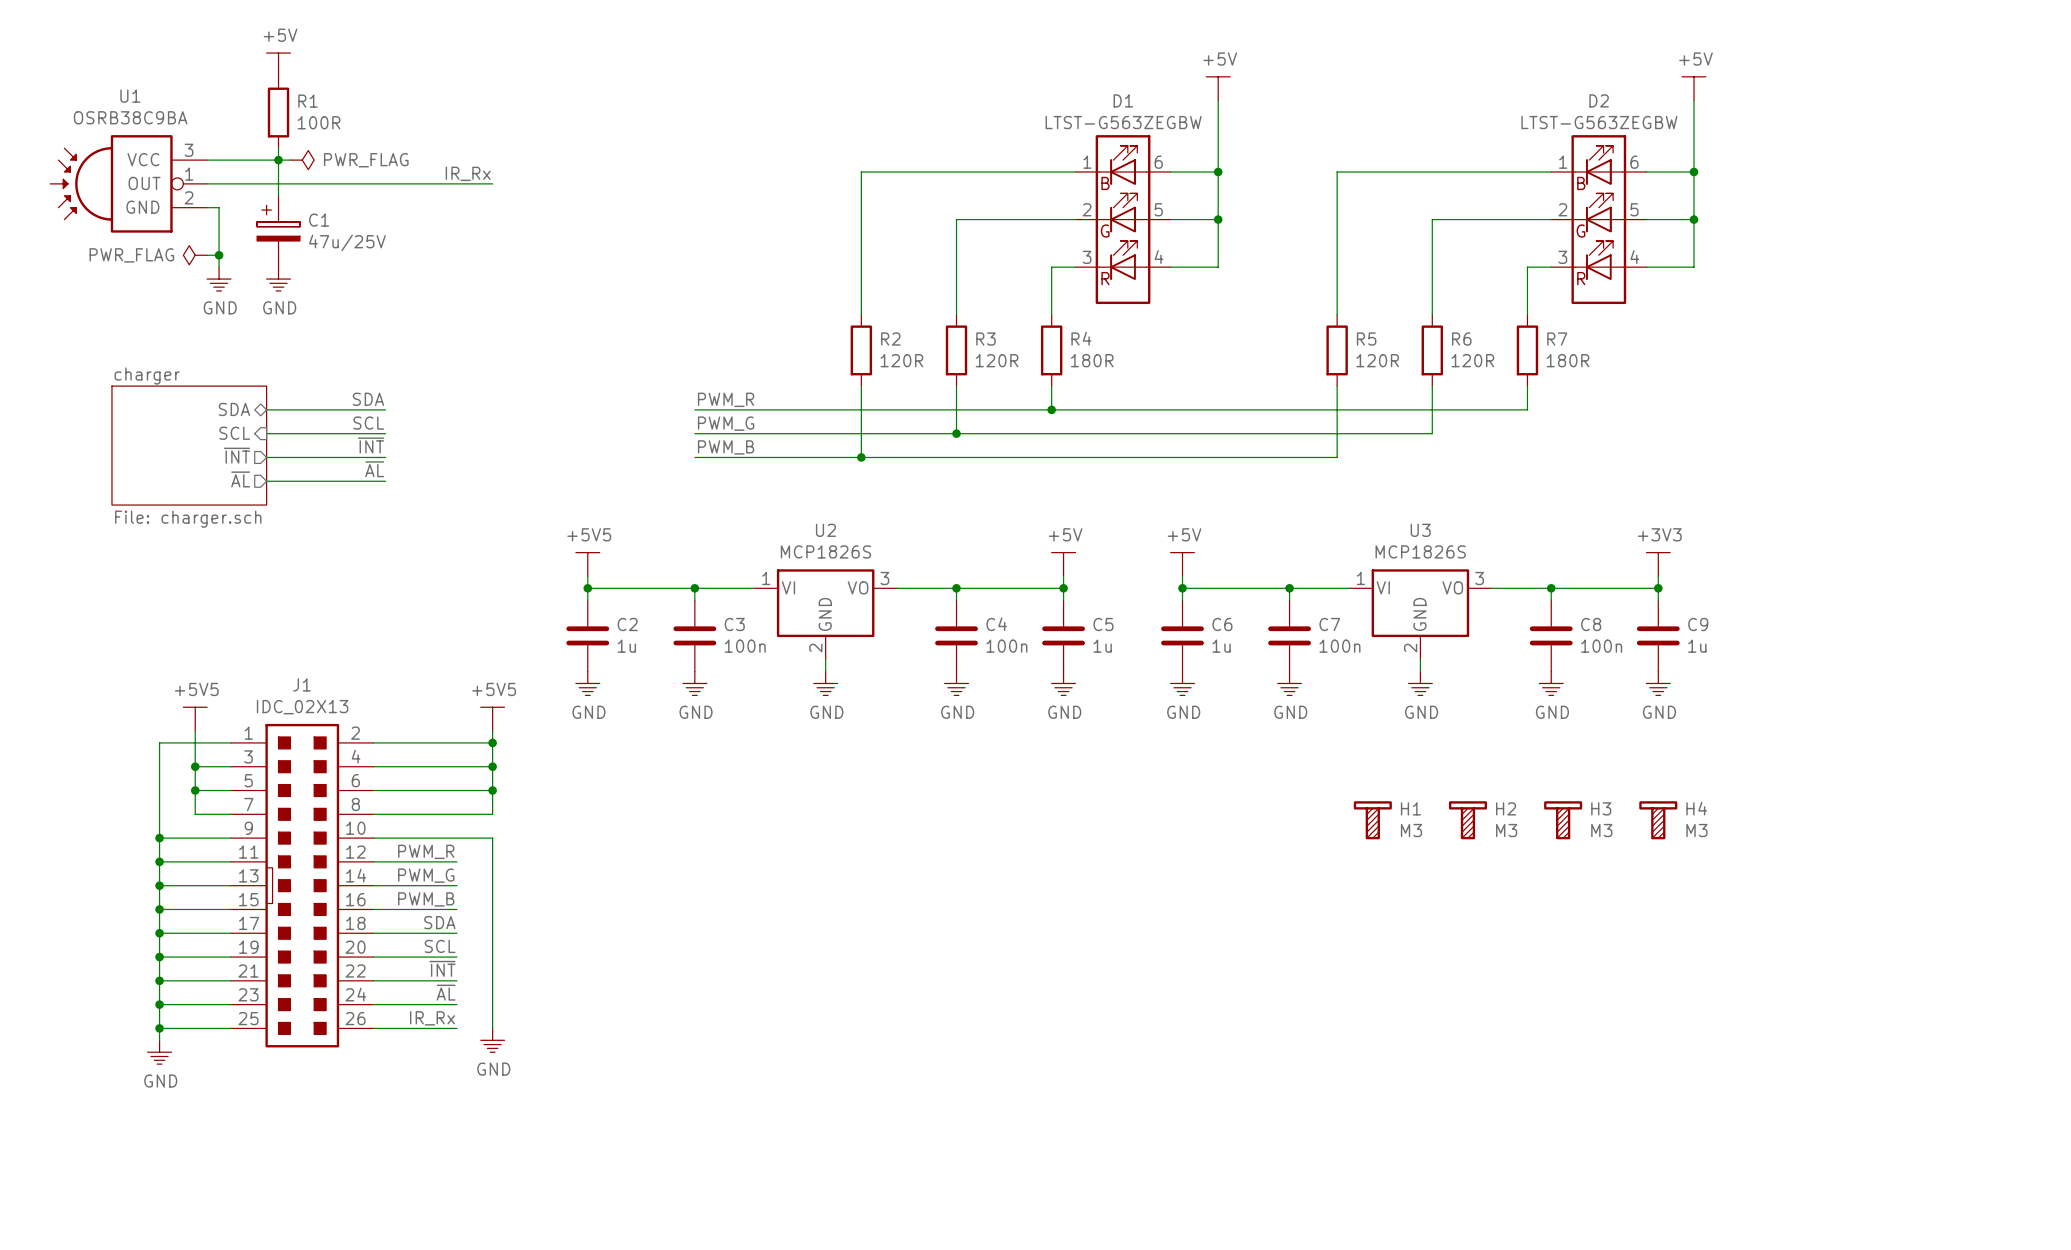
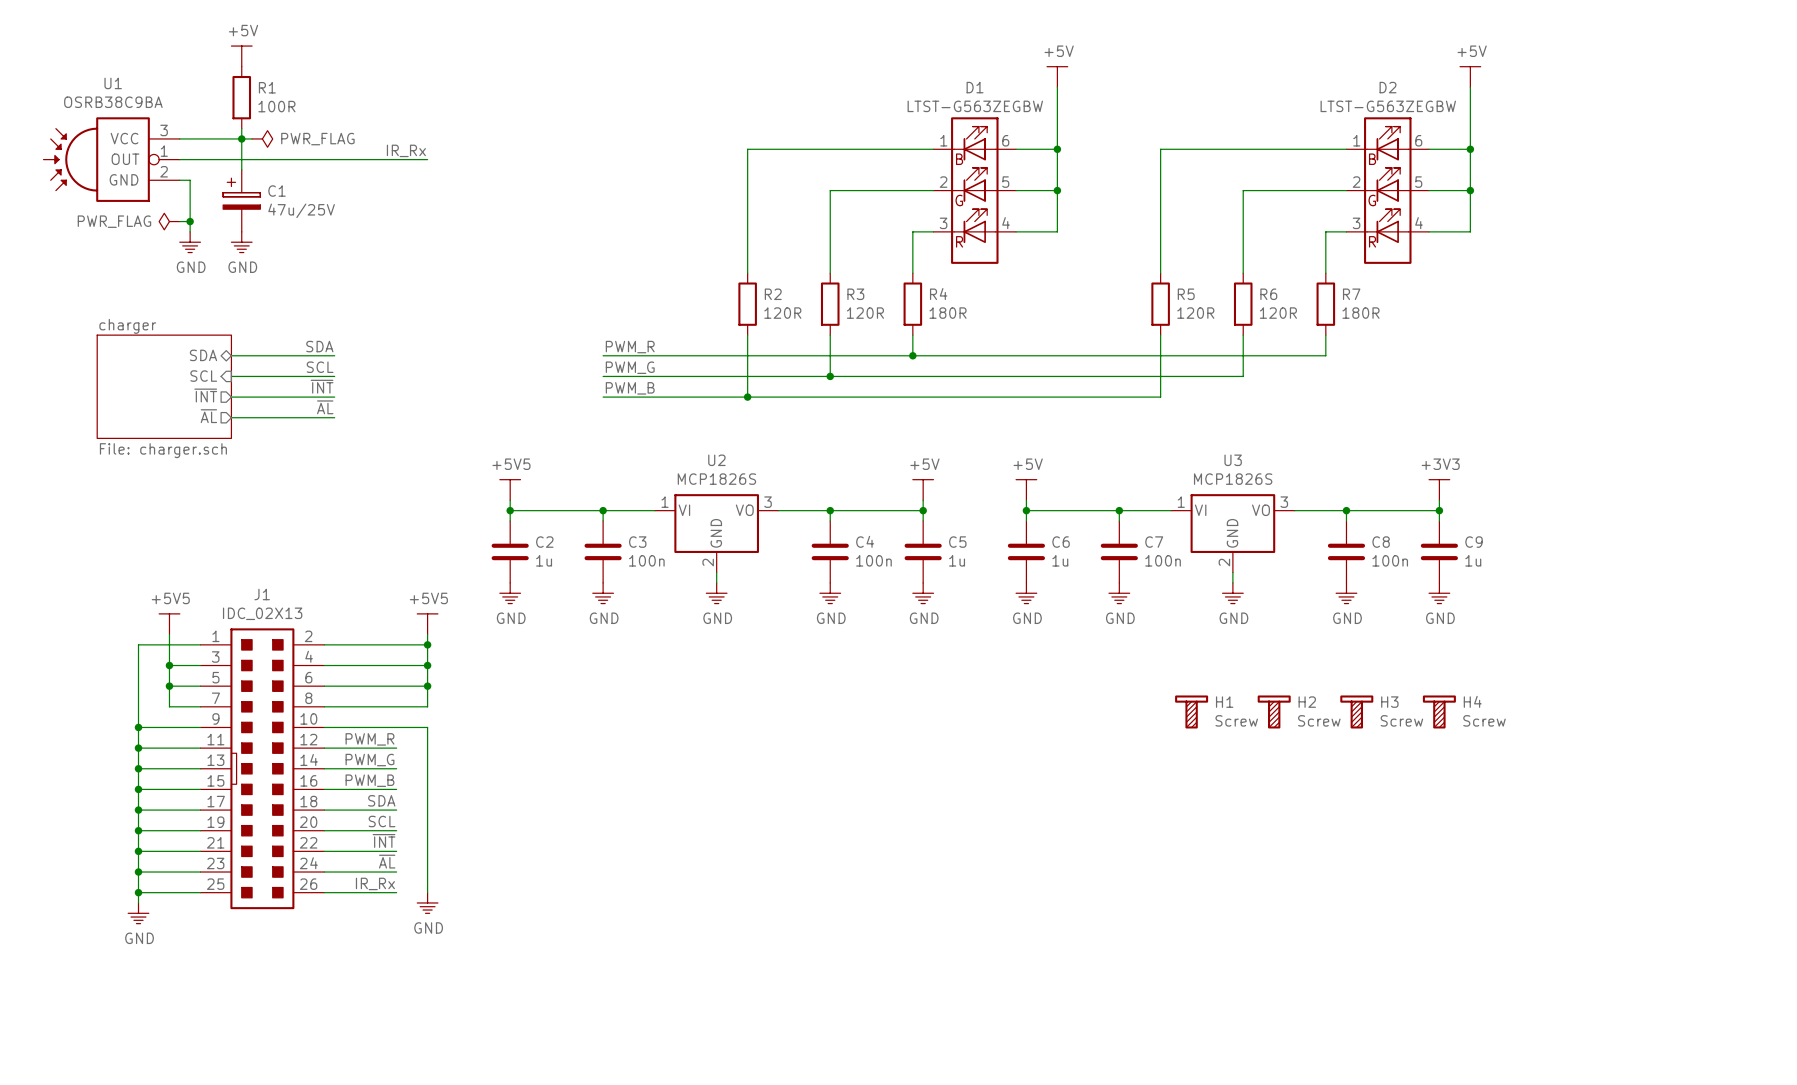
H1 value: M3 (1411, 830) -> Screw (1236, 720)
H2 value: M3 (1506, 830) -> Screw (1319, 720)
H3 value: M3 (1601, 830) -> Screw (1401, 720)
H4 value: M3 (1696, 830) -> Screw (1484, 720)

